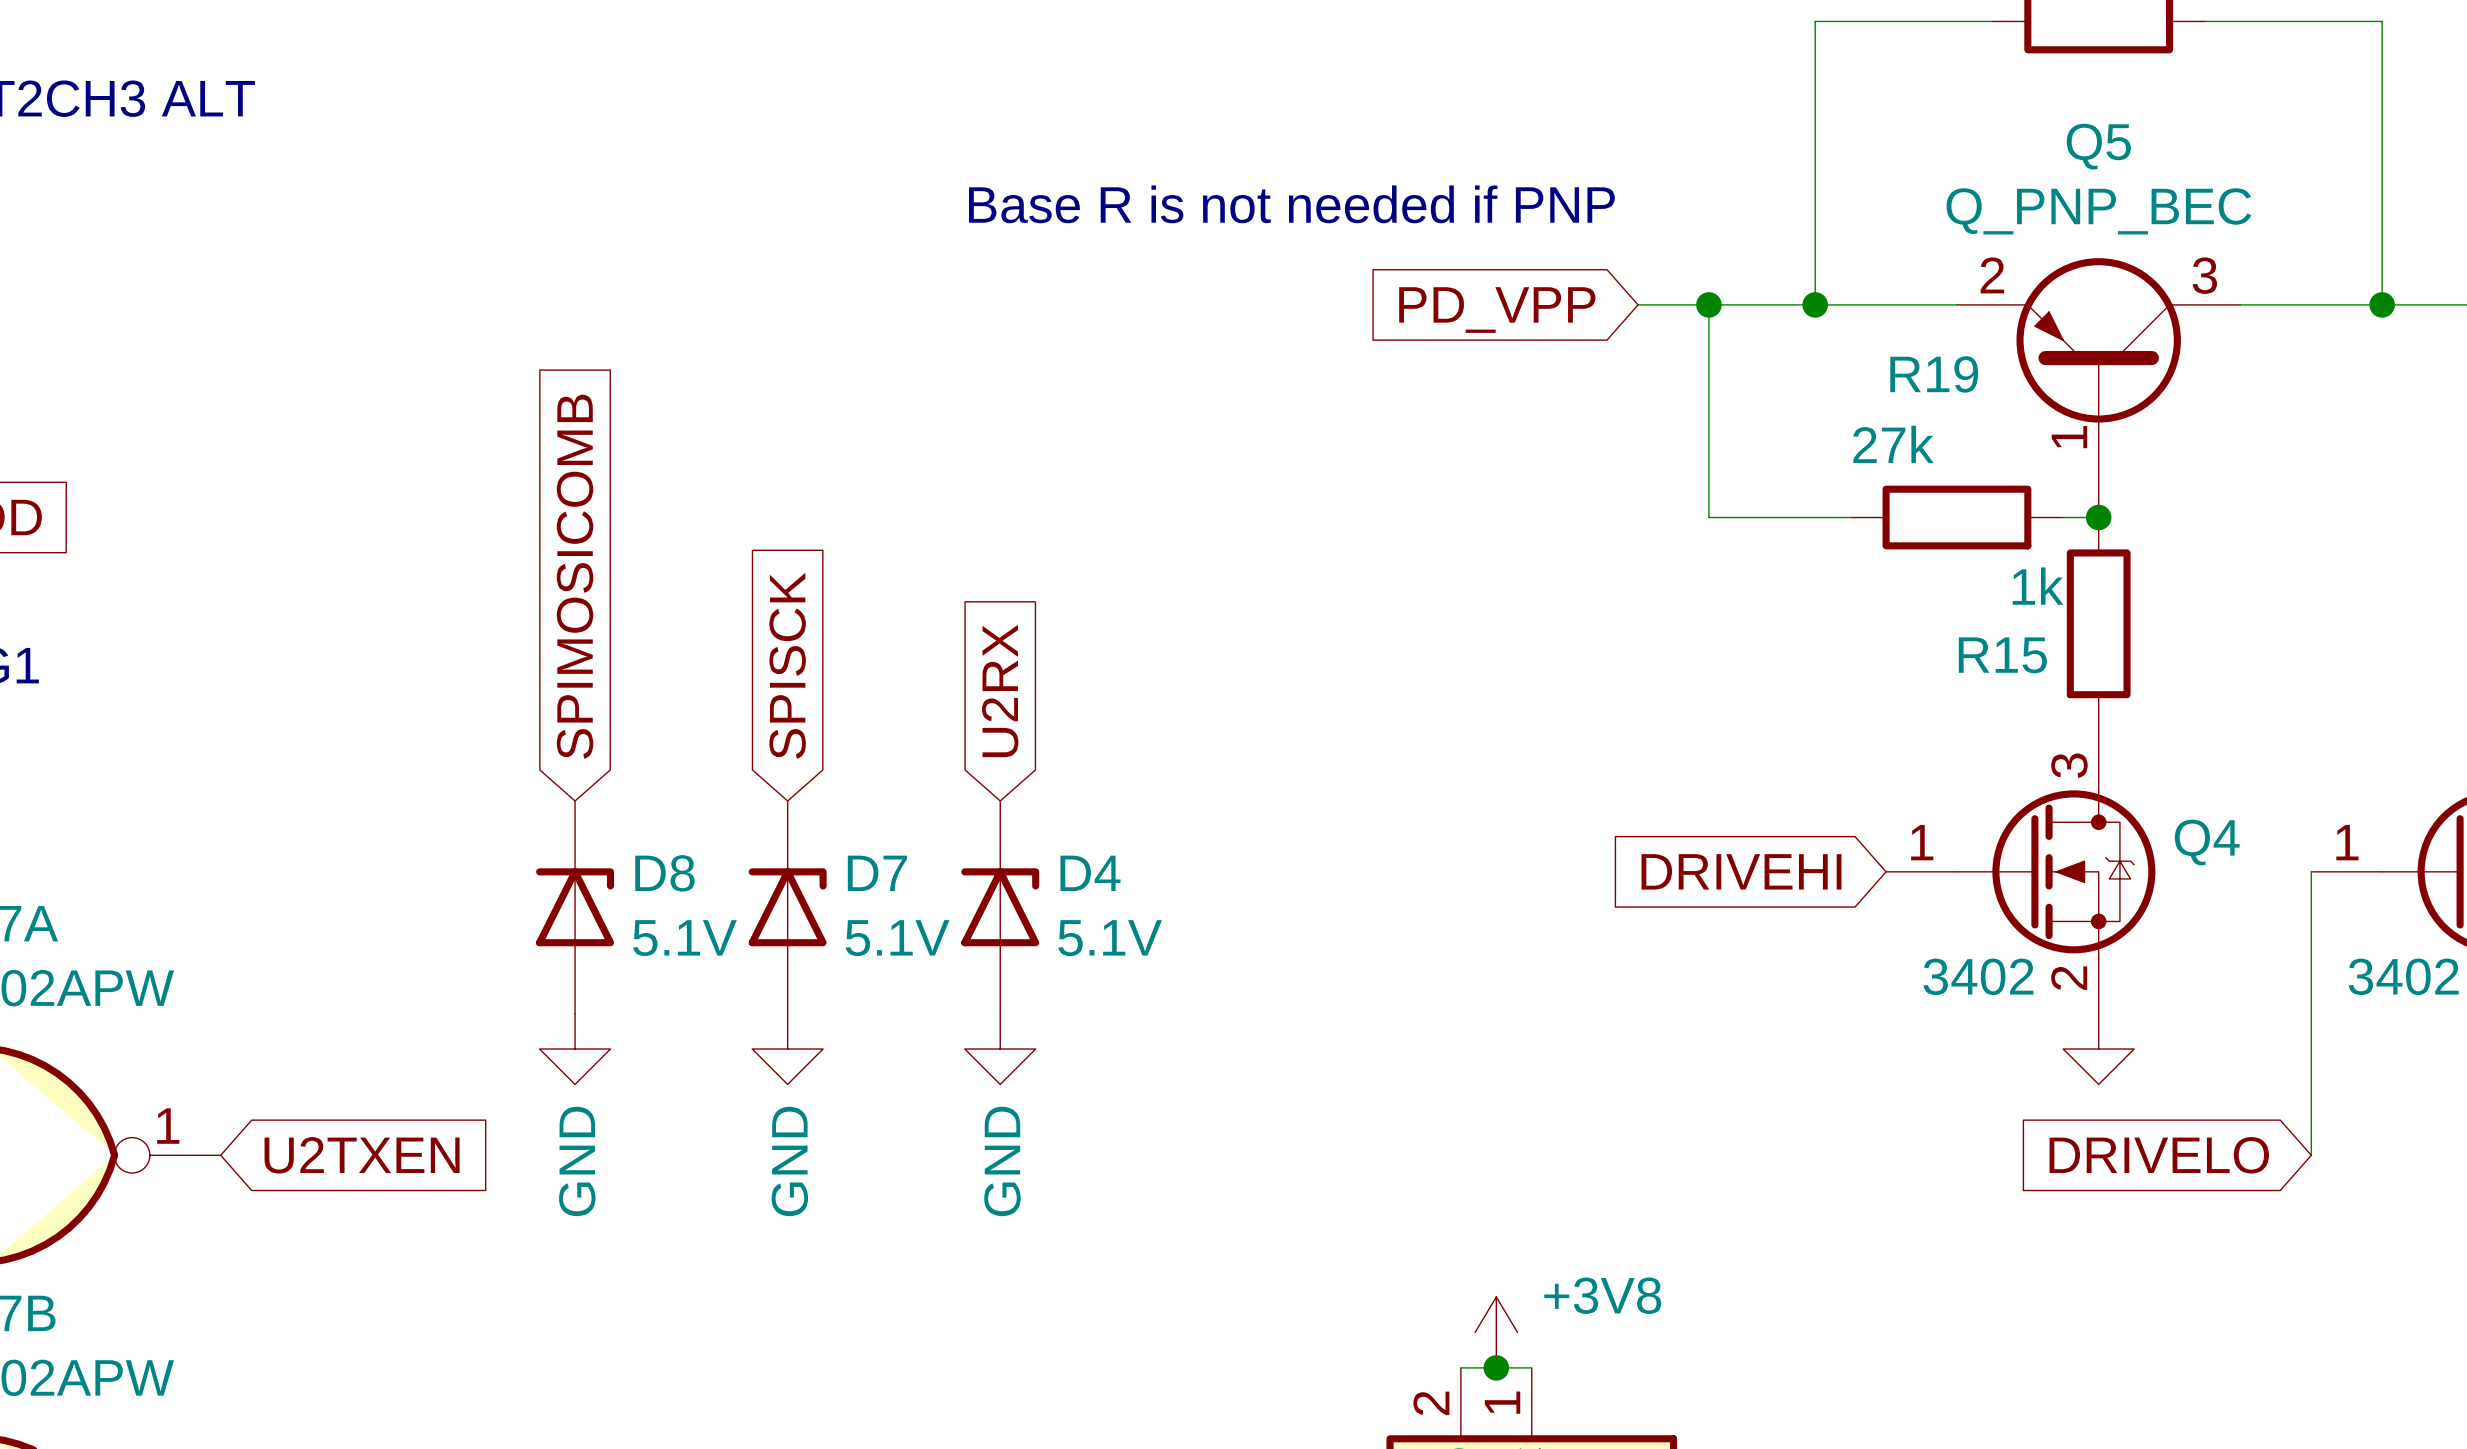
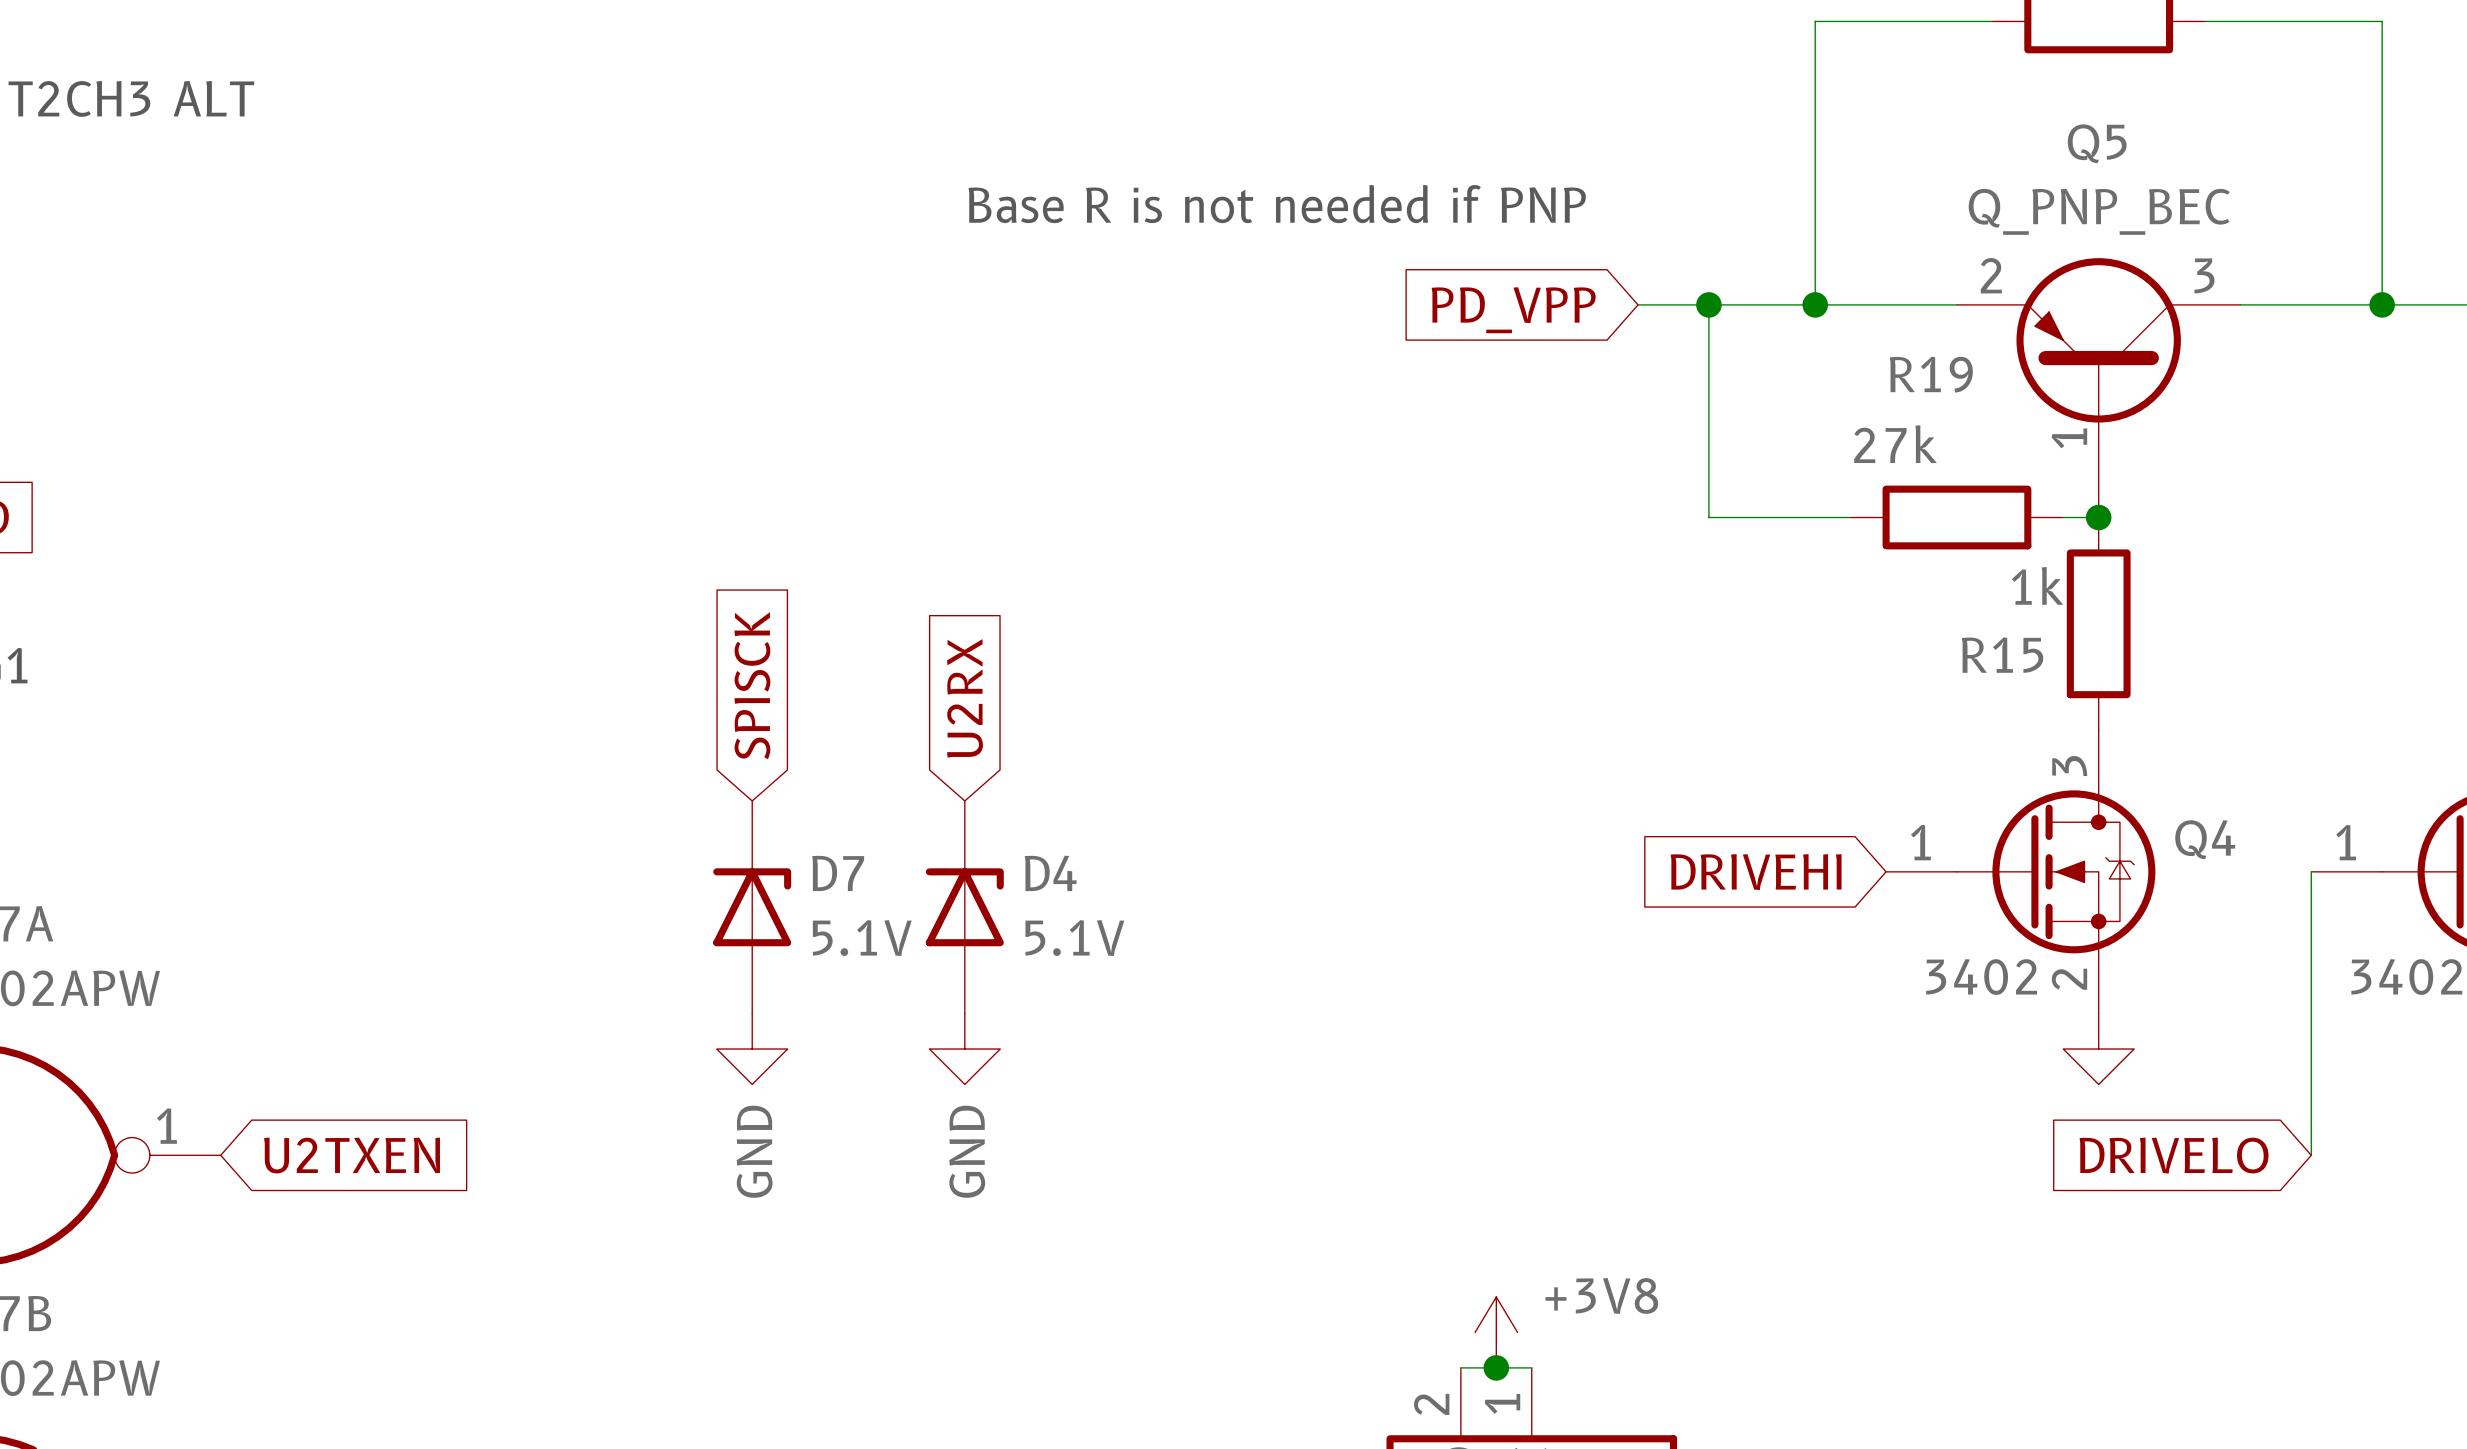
global label: SPIMOSICOMB (575, 576) -> none
global label position: SPISCK (787, 665) -> SPISCK (752, 685)
global label position: U2RX (1000, 690) -> U2RX (965, 698)
D8: 5.1V (575, 907) -> none
D7 position: (787, 907) -> (752, 907)
D4 position: (1000, 907) -> (964, 907)
power symbol: GND (575, 1049) -> none
power symbol position: GND (787, 1049) -> GND (752, 1049)
power symbol position: GND (1000, 1049) -> GND (964, 1049)

